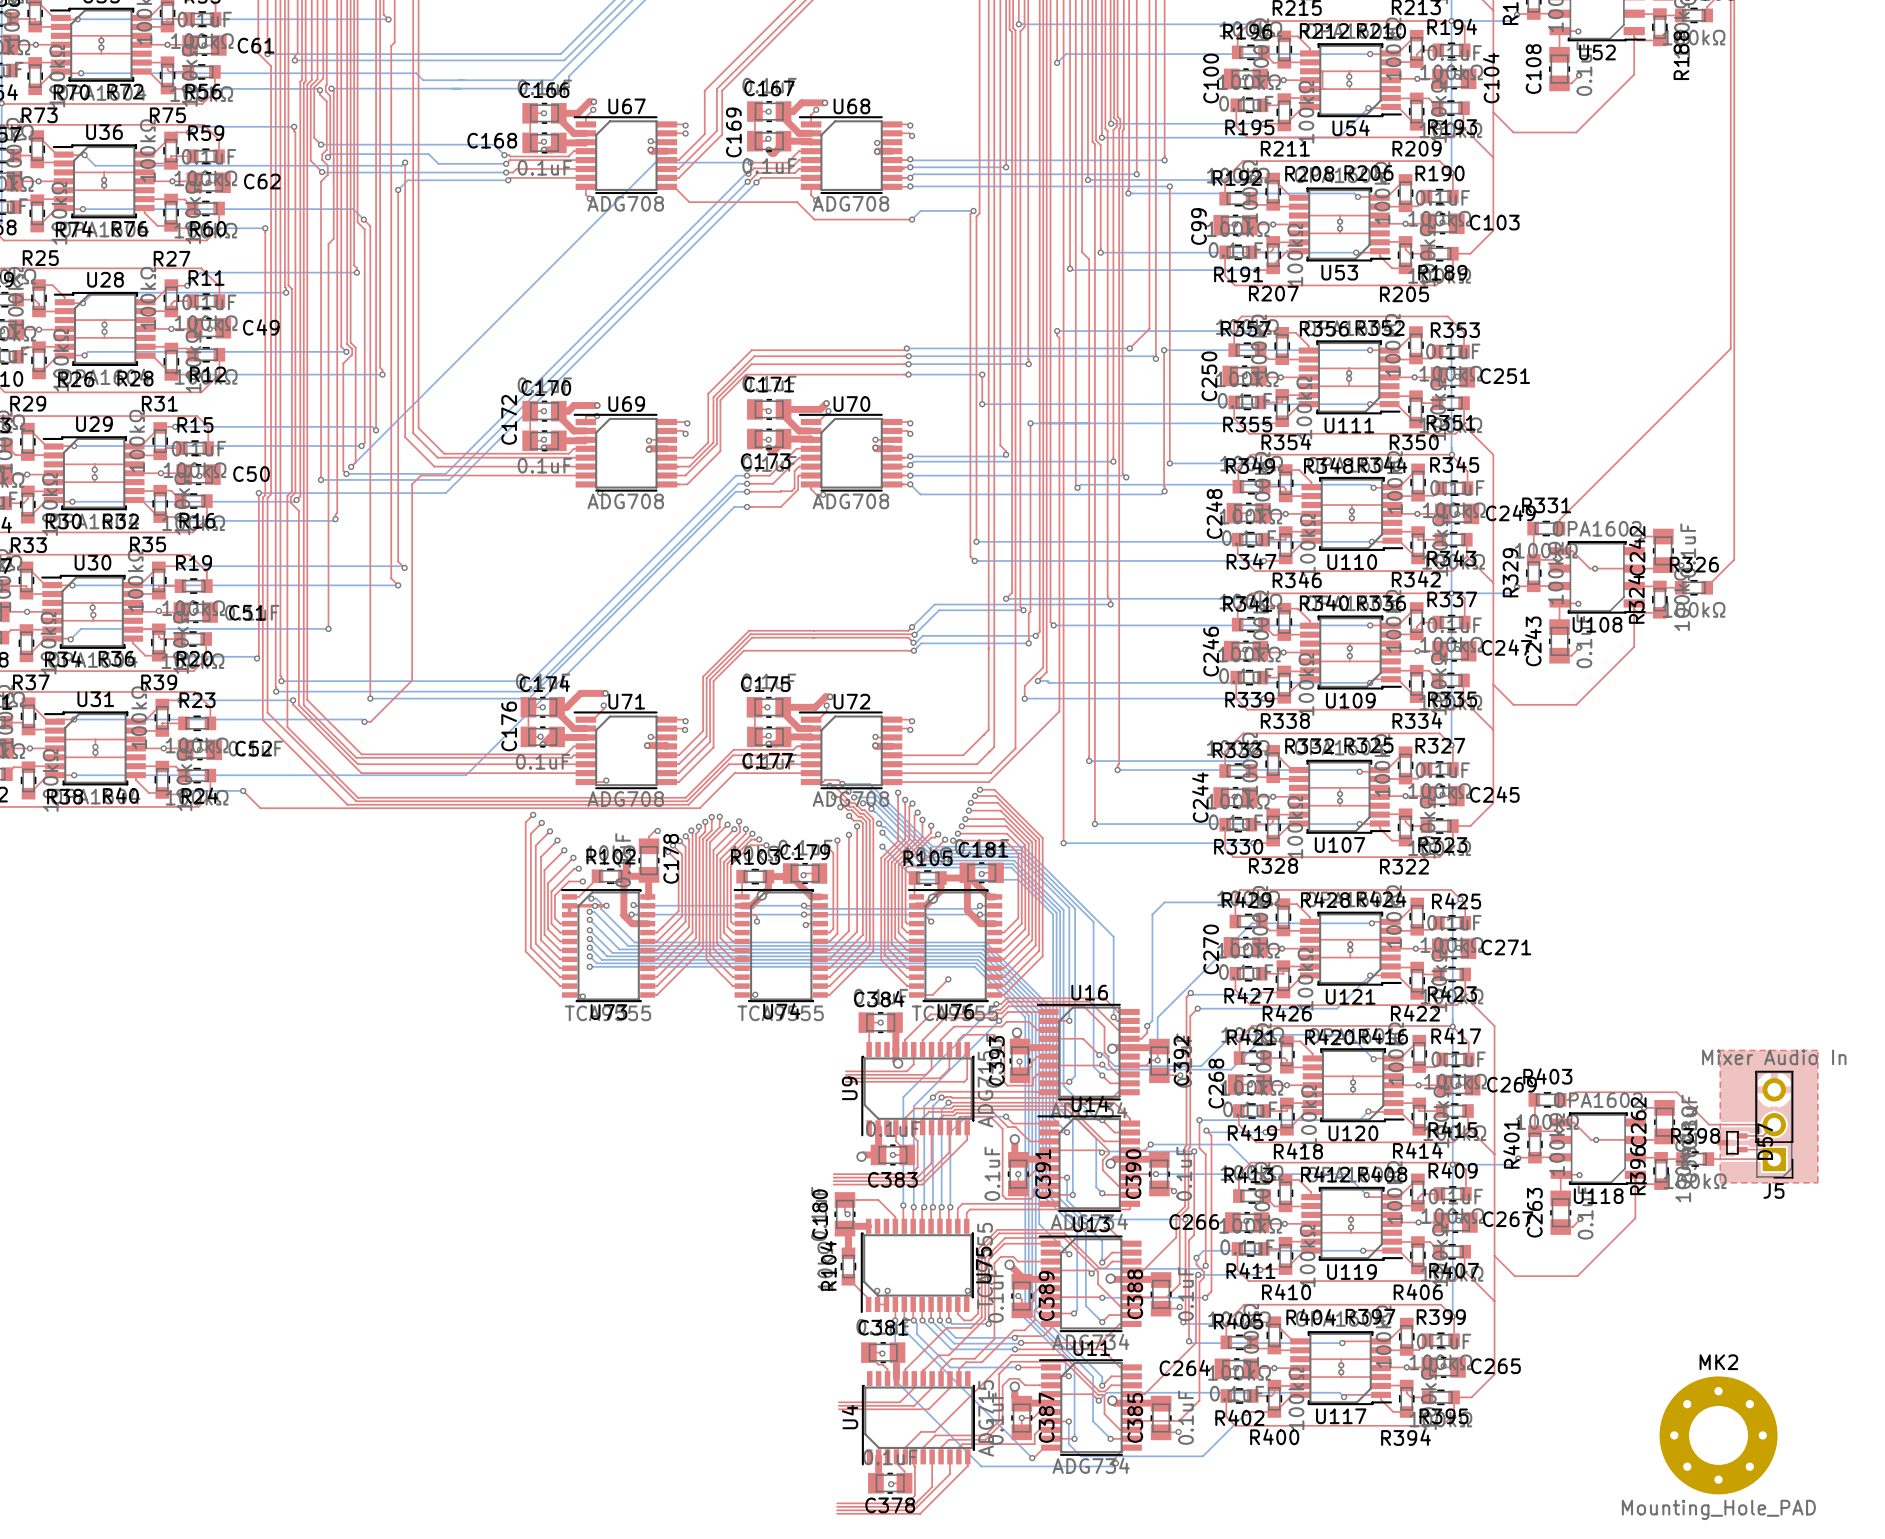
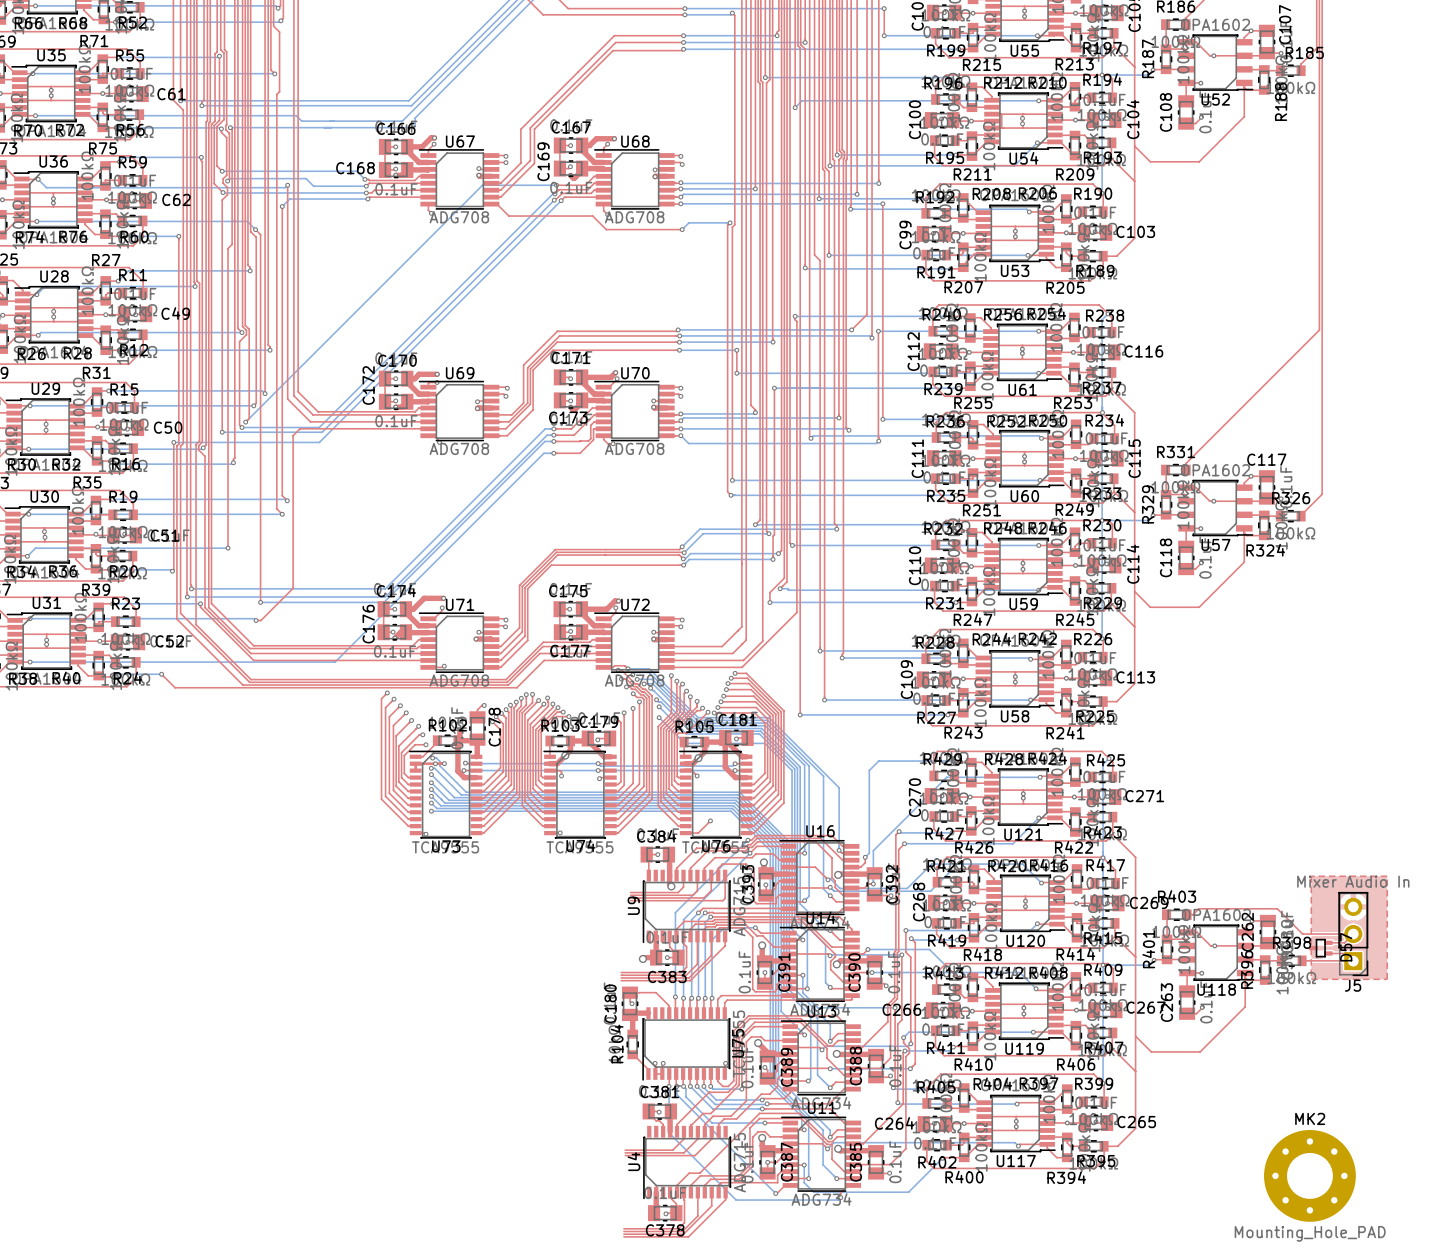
R357 name: R357 (1245, 328) -> R240 (941, 314)
R356 name: R356 (1324, 328) -> R256 (1003, 314)
R352 name: R352 (1380, 328) -> R254 (1046, 313)
R353 name: R353 (1455, 330) -> R238 (1105, 315)
C250 name: C250 (1209, 376) -> C112 (913, 351)
C251 name: C251 (1505, 376) -> C116 (1143, 351)
R351 name: R351 (1451, 422) -> R237 (1102, 387)
R355 name: R355 (1247, 424) -> R239 (943, 389)
U111 name: U111 (1349, 425) -> U61 (1022, 389)
R354 name: R354 (1286, 442) -> R255 (973, 402)
R350 name: R350 (1414, 442) -> R253 (1073, 402)
R344 name: R344 (1382, 464) -> R250 (1048, 420)
R345 name: R345 (1454, 464) -> R234 (1104, 420)
R349 name: R349 (1250, 465) -> R236 (945, 421)
R348 name: R348 (1328, 465) -> R252 (1006, 421)
C248 name: C248 (1214, 513) -> C111 (917, 458)
C249 name: C249 (1510, 513) -> C115 (1134, 458)
C242 name: C242 (1637, 550) -> C117 (1266, 459)
R343 name: R343 (1451, 558) -> R233 (1102, 493)
R347 name: R347 (1251, 561) -> R235 (946, 495)
U110 name: U110 (1352, 562) -> U60 (1024, 496)
R346 name: R346 (1297, 579) -> R251 (981, 510)
R342 name: R342 (1416, 579) -> R249 (1074, 509)
R324 name rotation: 0° (1636, 598) -> 90° clockwise (1265, 550)
R337 name: R337 (1452, 599) -> R230 (1102, 525)
R340 name: R340 (1324, 602) -> R248 (1003, 527)
R341 name: R341 (1247, 603) -> R232 (943, 528)
R336 name: R336 (1381, 603) -> R246 (1047, 527)
U108 name: U108 (1597, 624) -> U57 (1215, 544)
C243 name: C243 (1533, 641) -> C118 (1166, 557)
C247 name: C247 (1506, 647) -> C114 (1133, 564)
C246 name: C246 (1210, 651) -> C110 (915, 565)
R339 name: R339 (1249, 699) -> R231 (945, 603)
R335 name: R335 (1452, 699) -> R229 (1102, 603)
U109 name: U109 (1350, 700) -> U59 (1023, 604)
R334 name: R334 (1417, 720) -> R245 (1075, 619)
R338 name: R338 (1285, 721) -> R247 (973, 619)
R325 name: R325 (1368, 745) -> R242 (1037, 638)
R327 name: R327 (1440, 745) -> R226 (1093, 639)
R332 name: R332 (1309, 746) -> R244 (992, 639)
R333 name: R333 (1237, 750) -> R228 (935, 642)
C245 name: C245 (1494, 794) -> C113 (1135, 677)
C244 name: C244 (1200, 797) -> C109 (906, 679)
U107 name: U107 (1340, 844) -> U58 (1015, 716)
R323 name: R323 (1442, 845) -> R225 (1095, 716)
R330 name: R330 (1238, 846) -> R227 (936, 717)
R328 name: R328 (1273, 865) -> R243 (963, 732)
R322 name: R322 (1404, 866) -> R241 (1065, 732)

